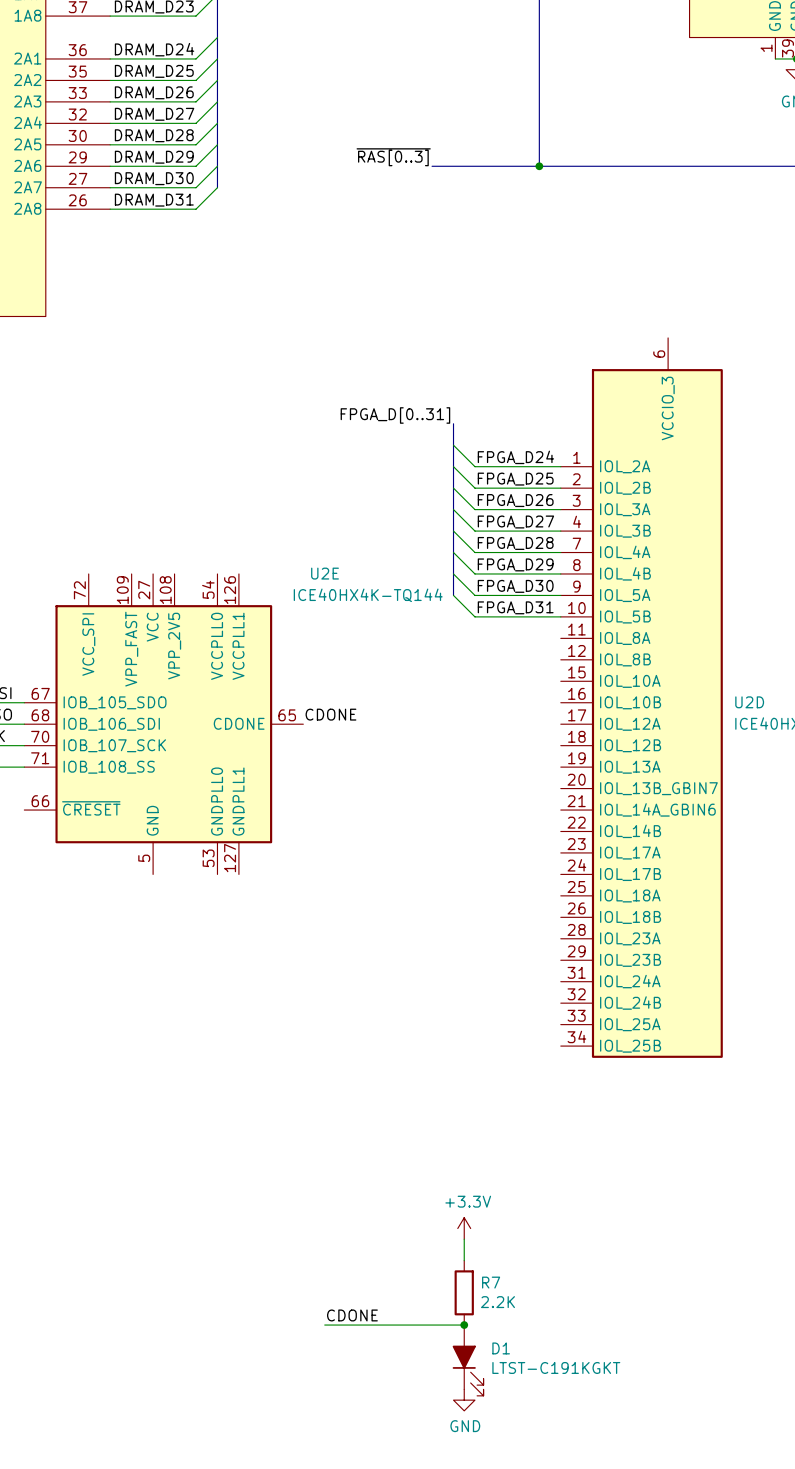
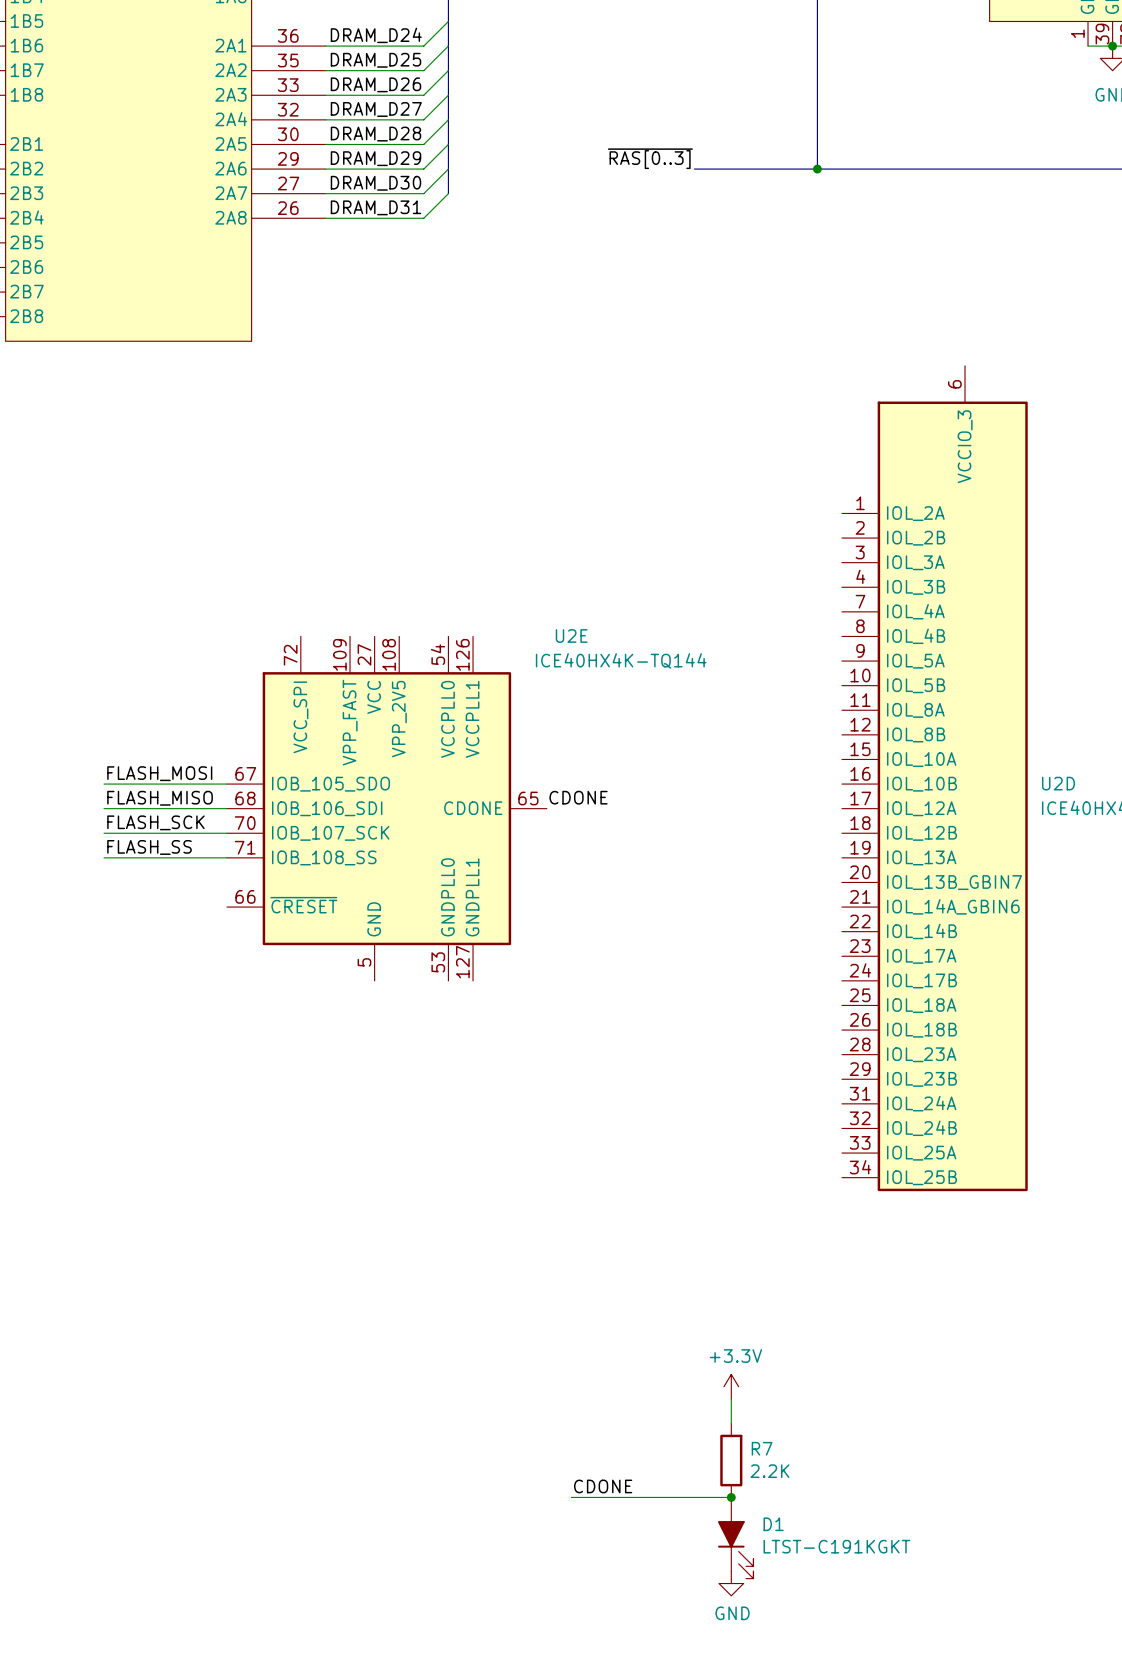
label: FPGA_D[0..31] (395, 415) -> none
bus: (453, 423) (453, 595) -> none
wire: (453, 445) (474, 466) (560, 466) -> none
label: FPGA_D24 (515, 457) -> none
wire: (453, 466) (474, 488) (560, 488) -> none
label: FPGA_D25 (515, 479) -> none
wire: (453, 488) (474, 509) (560, 509) -> none
label: FPGA_D26 (515, 500) -> none
wire: (453, 509) (474, 531) (560, 531) -> none
label: FPGA_D27 (515, 522) -> none
wire: (453, 531) (474, 552) (560, 552) -> none
label: FPGA_D28 (515, 543) -> none
wire: (453, 552) (474, 573) (560, 573) -> none
label: FPGA_D29 (515, 564) -> none
wire: (453, 573) (474, 595) (560, 595) -> none
label: FPGA_D30 (515, 586) -> none
wire: (453, 595) (474, 616) (560, 616) -> none
label: FPGA_D31 (515, 607) -> none

